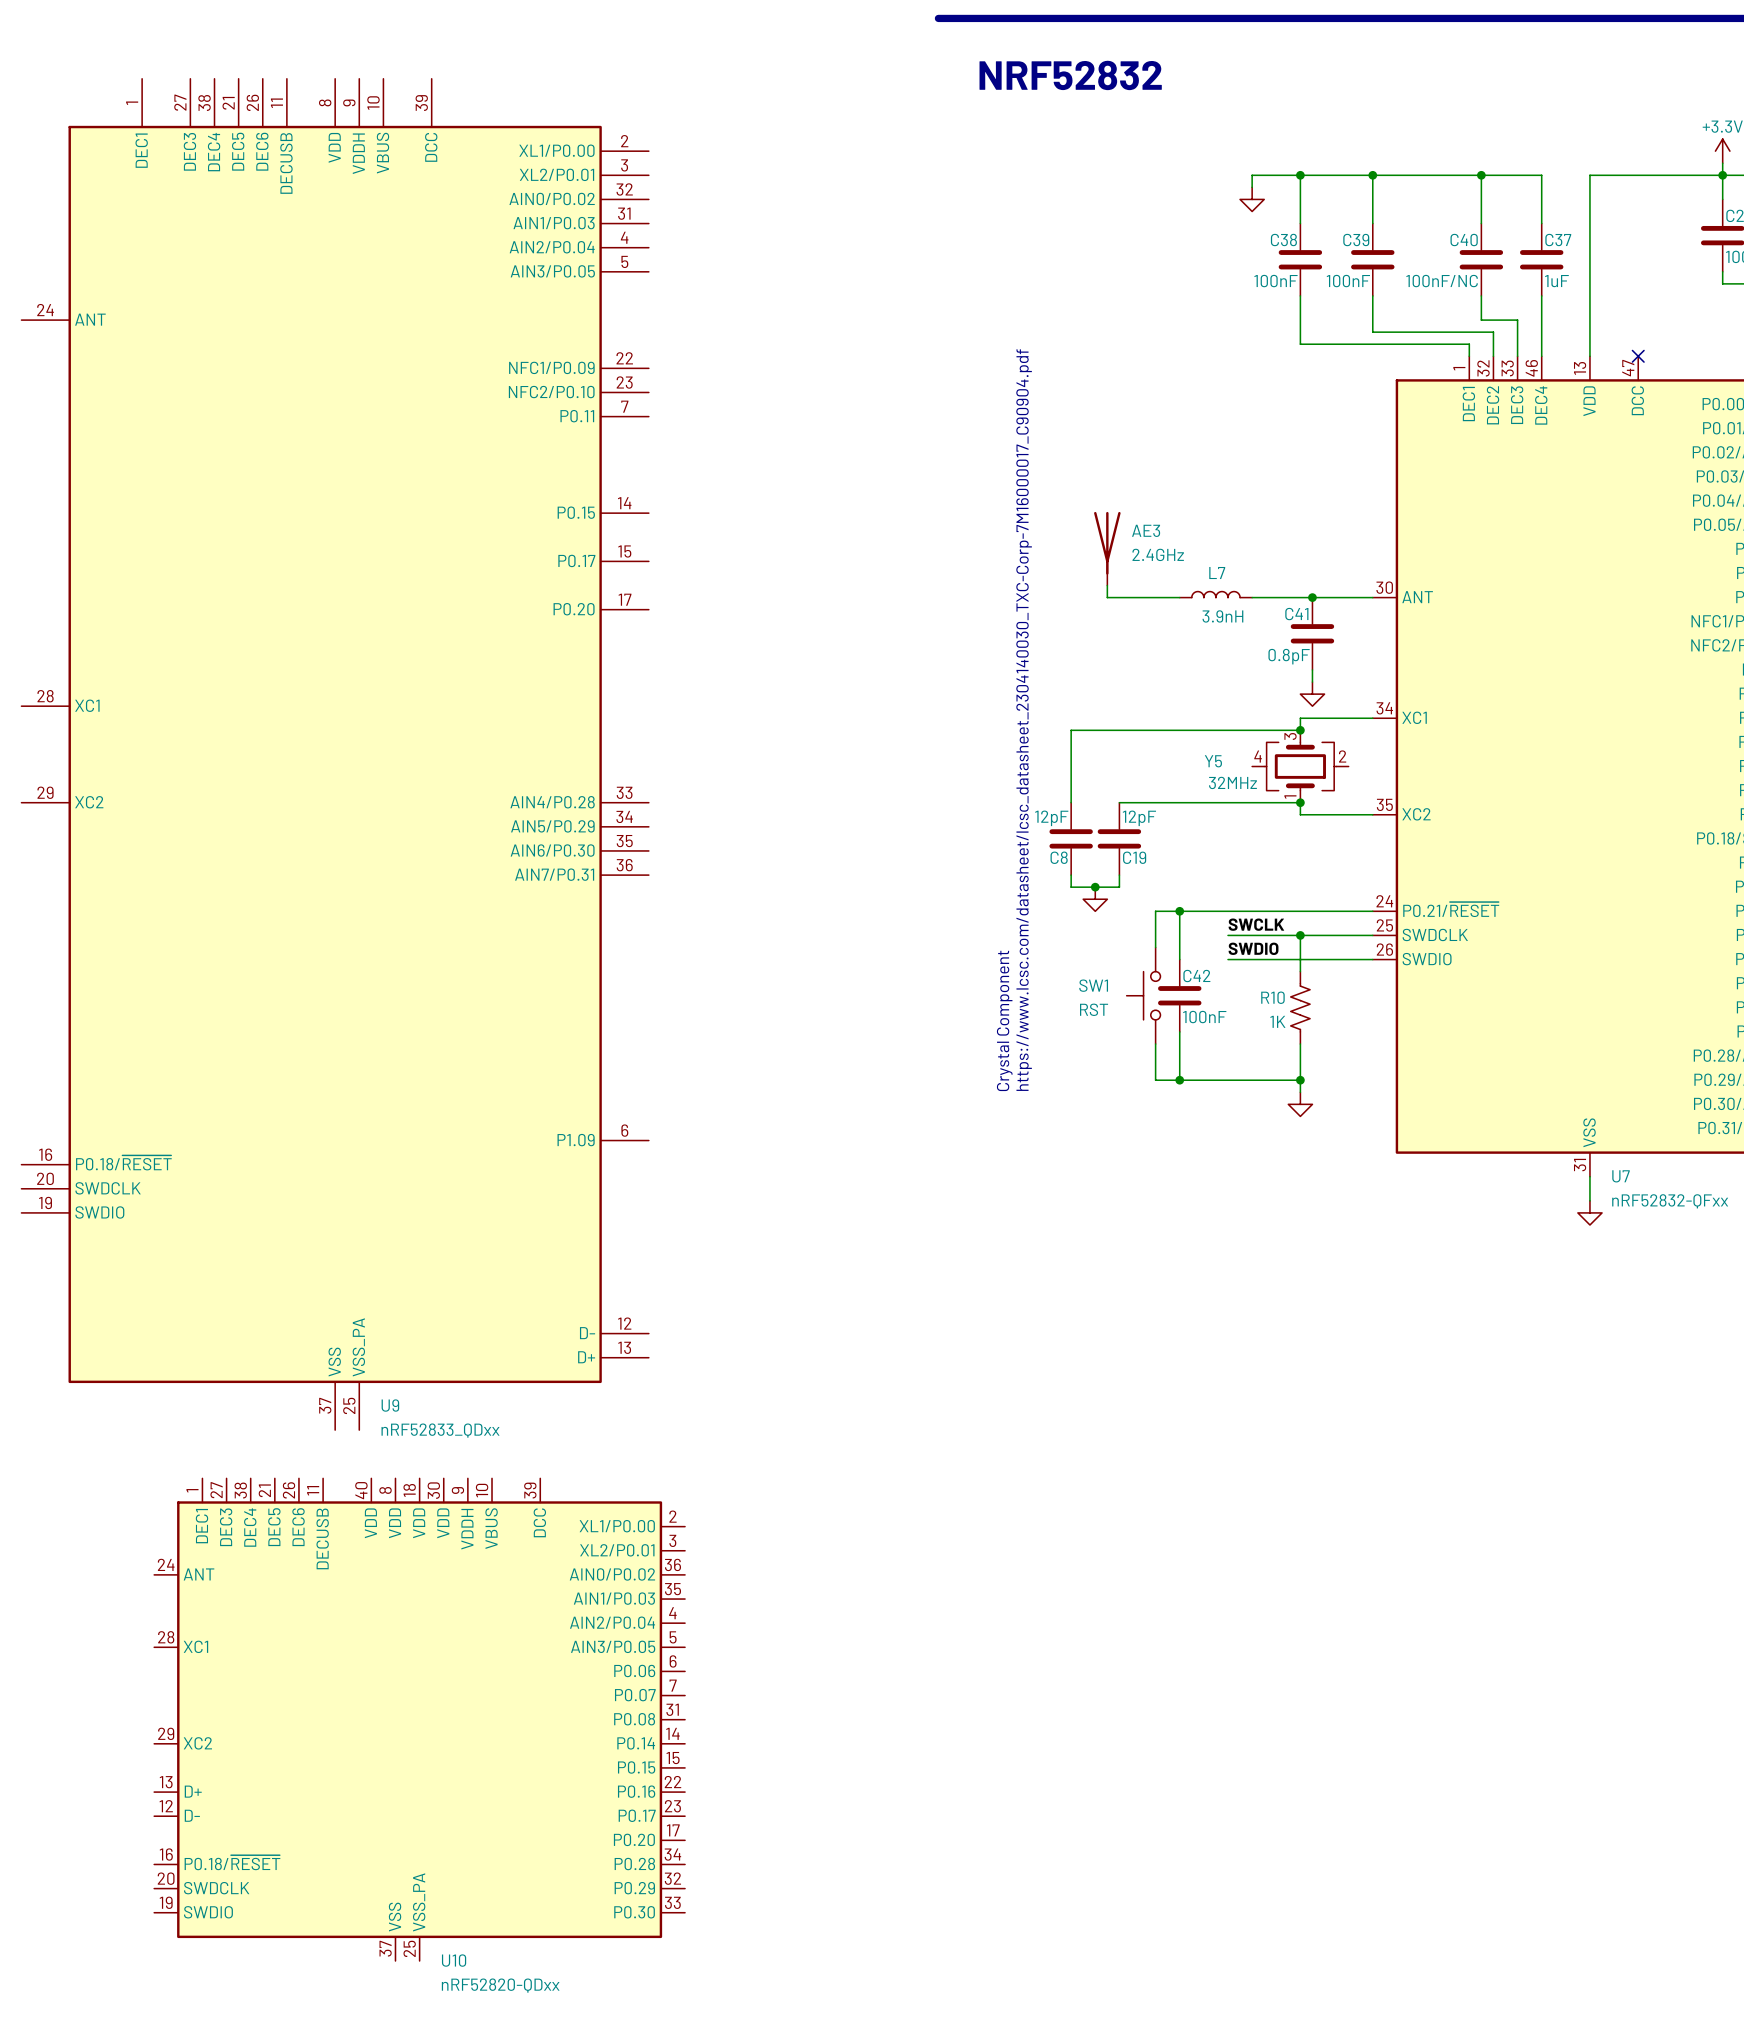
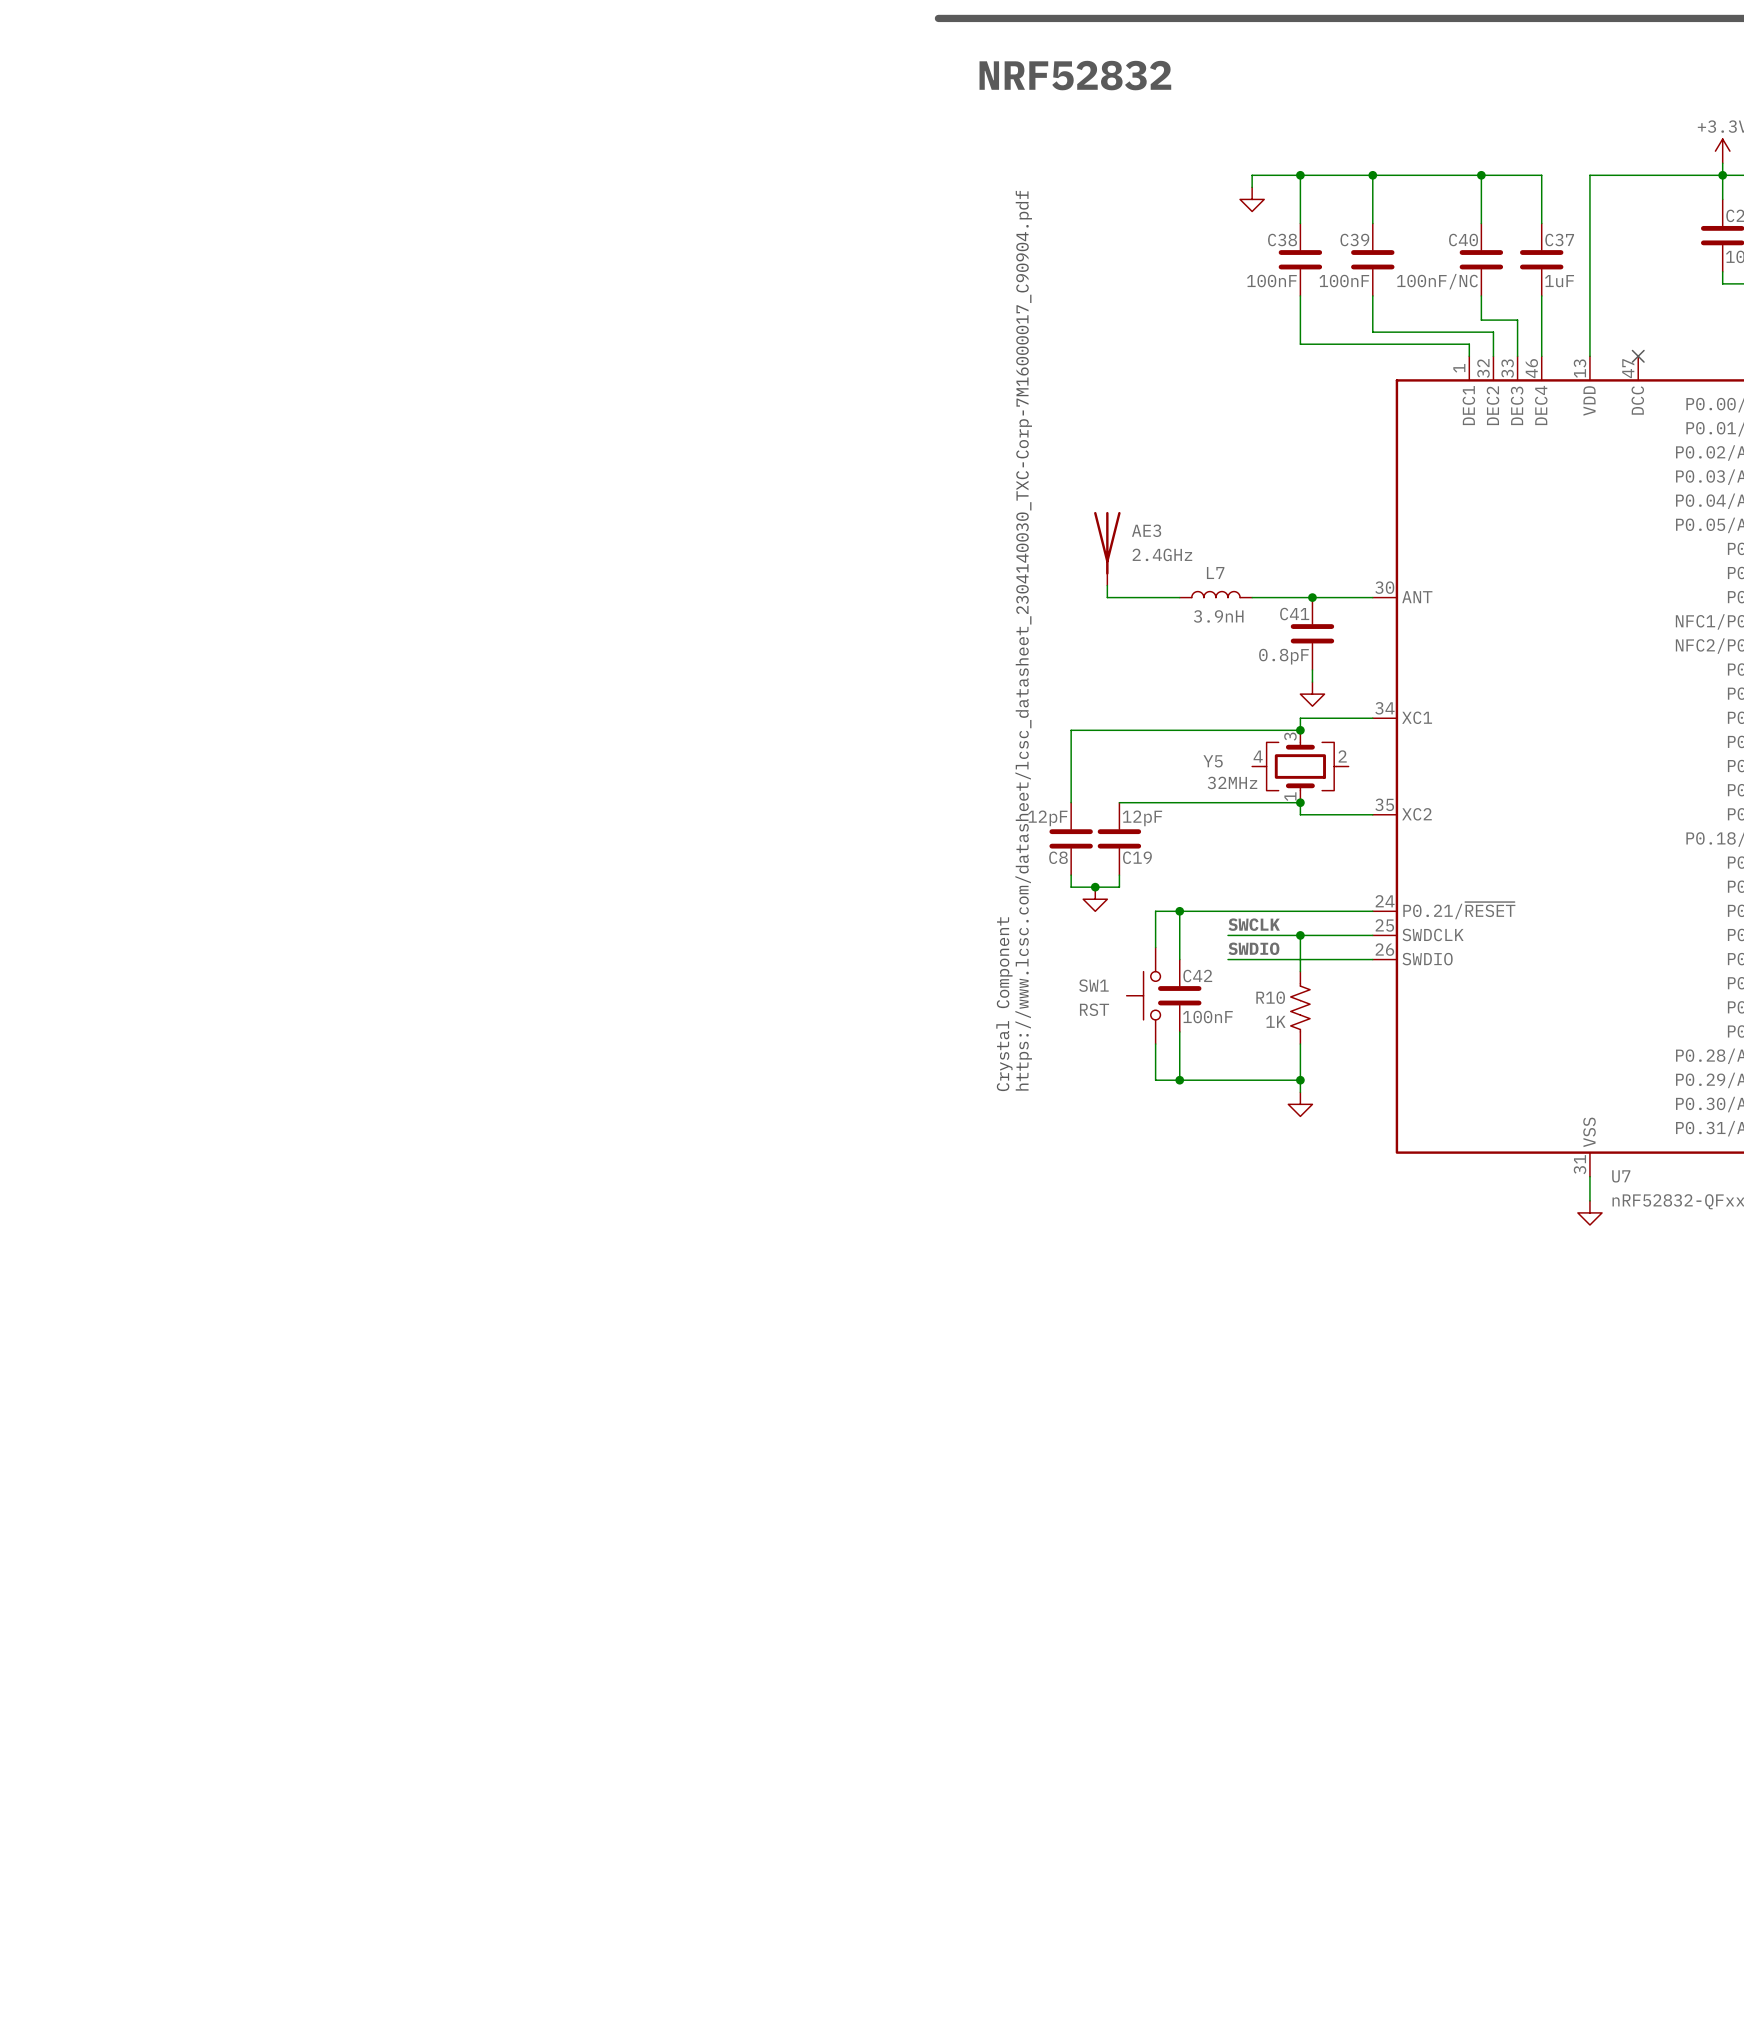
U9: nRF52833_QDxx (335, 754) -> none
U10: nRF52820-QDxx (419, 1719) -> none

